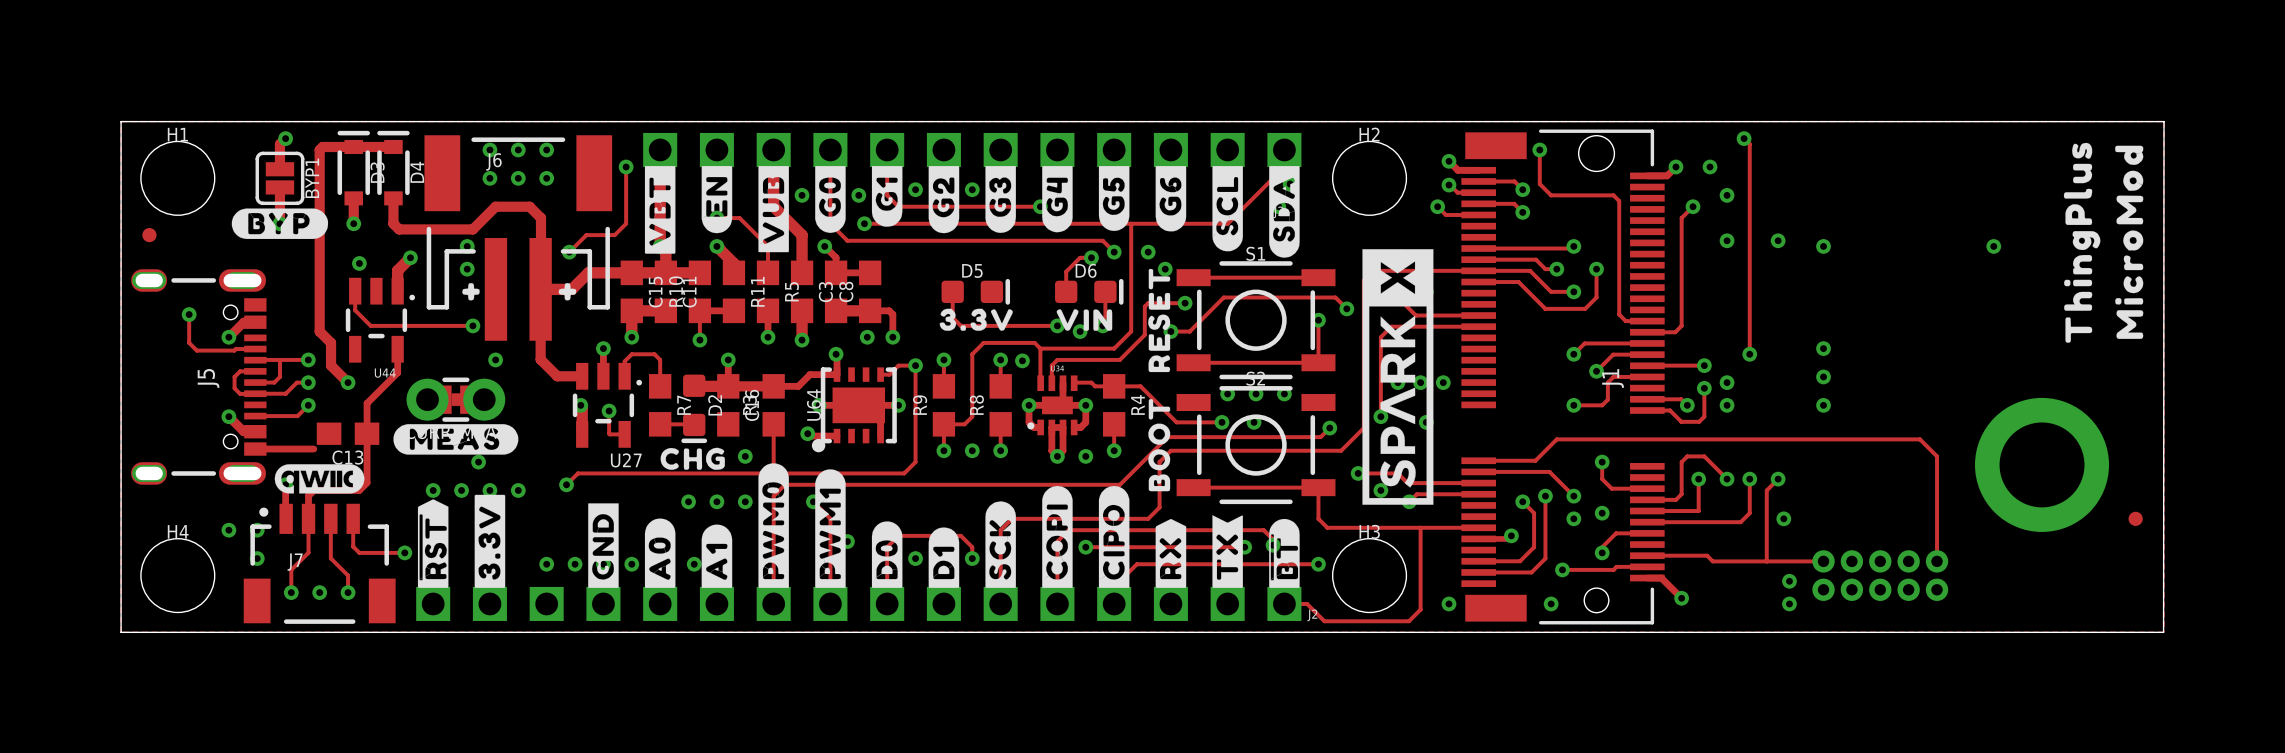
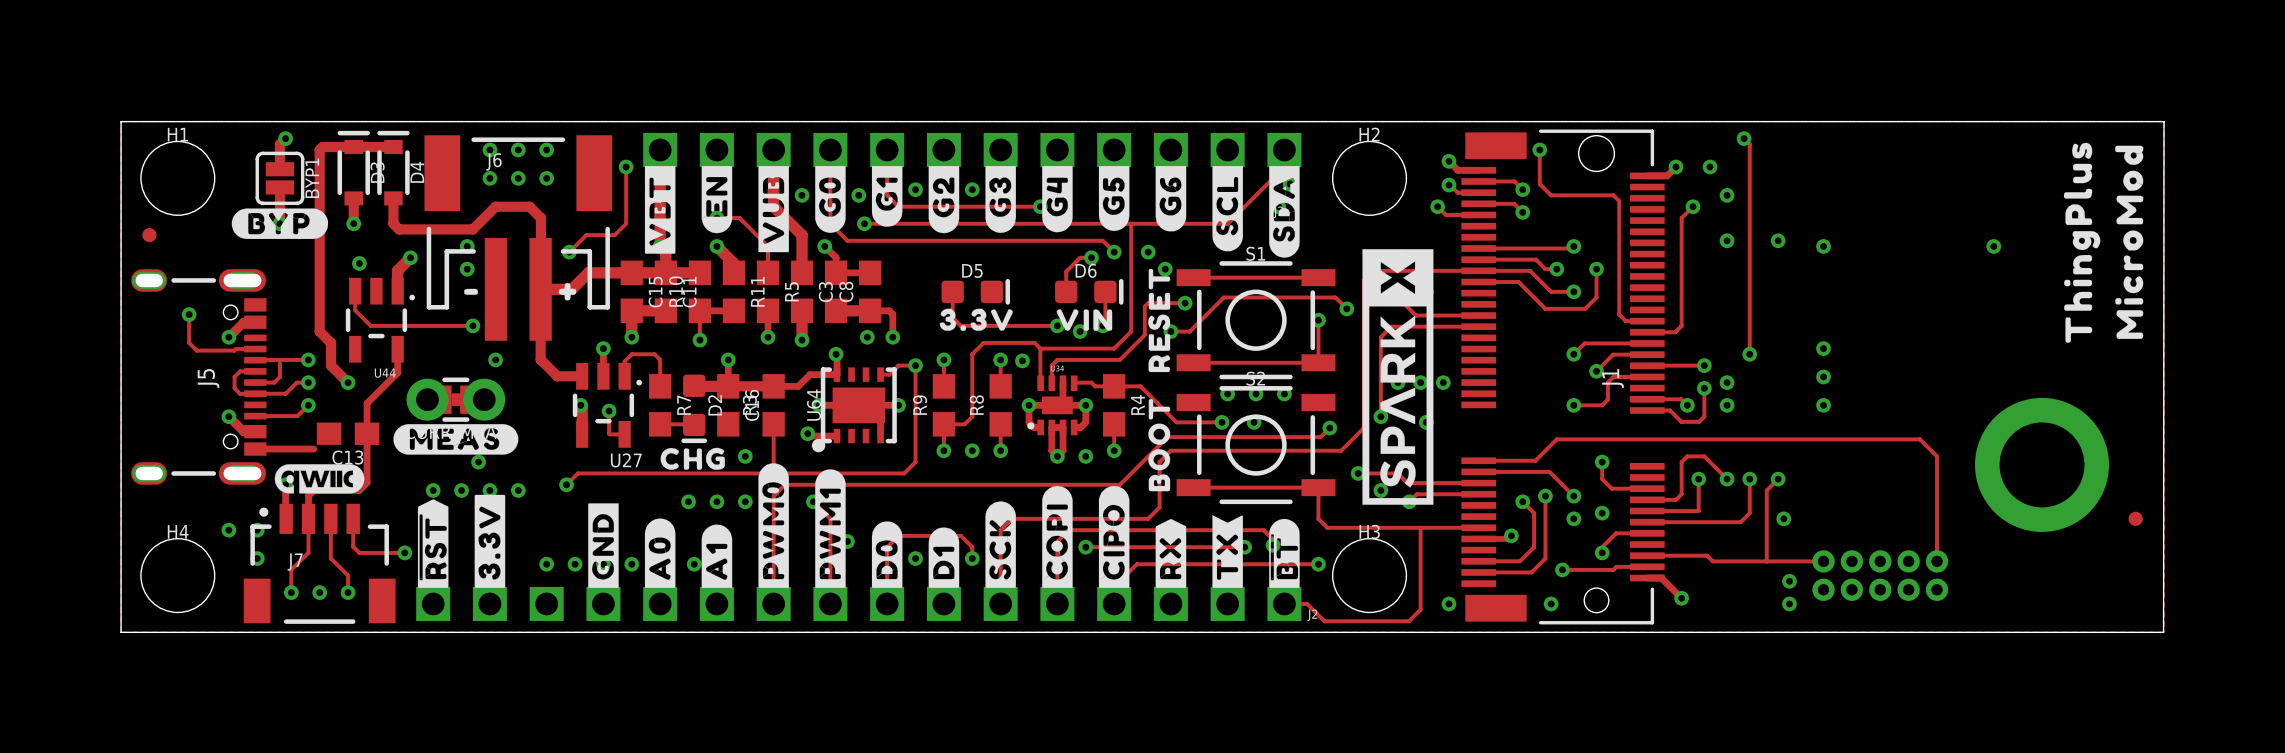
drawing shape: [462, 283, 480, 301] -> [464, 288, 478, 295]

